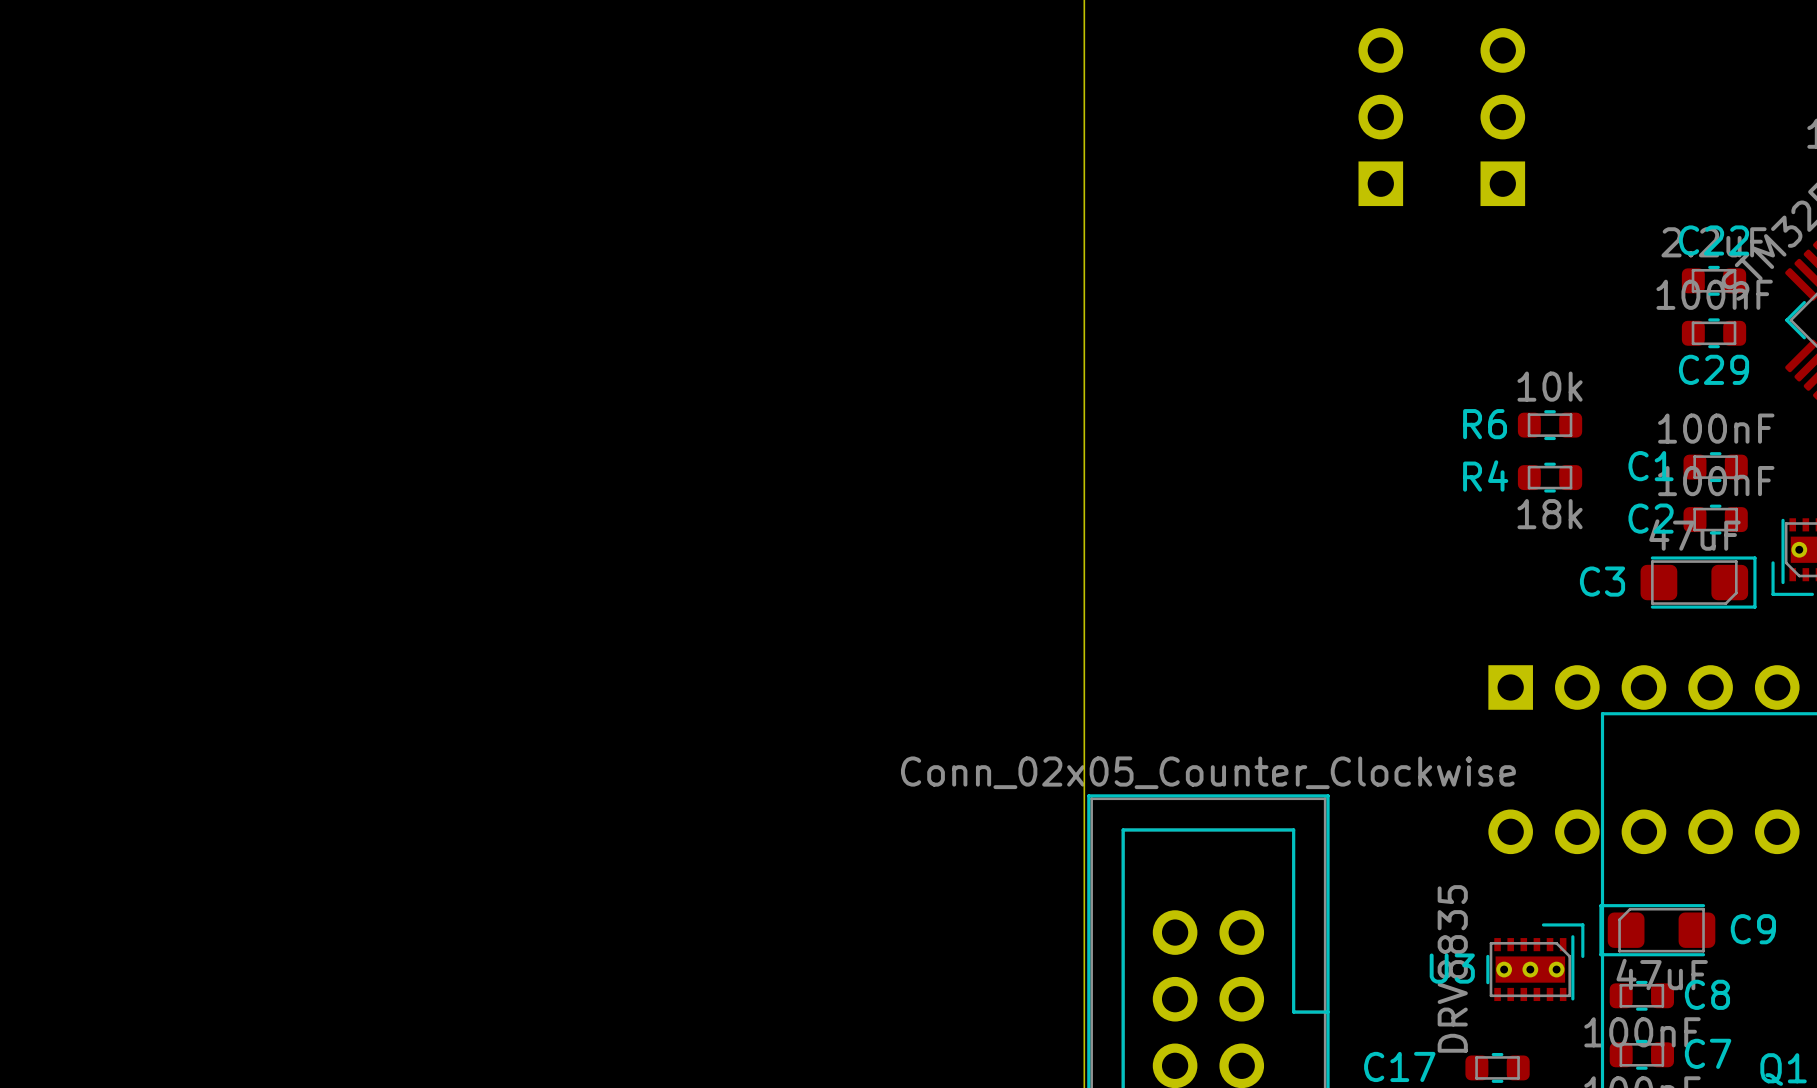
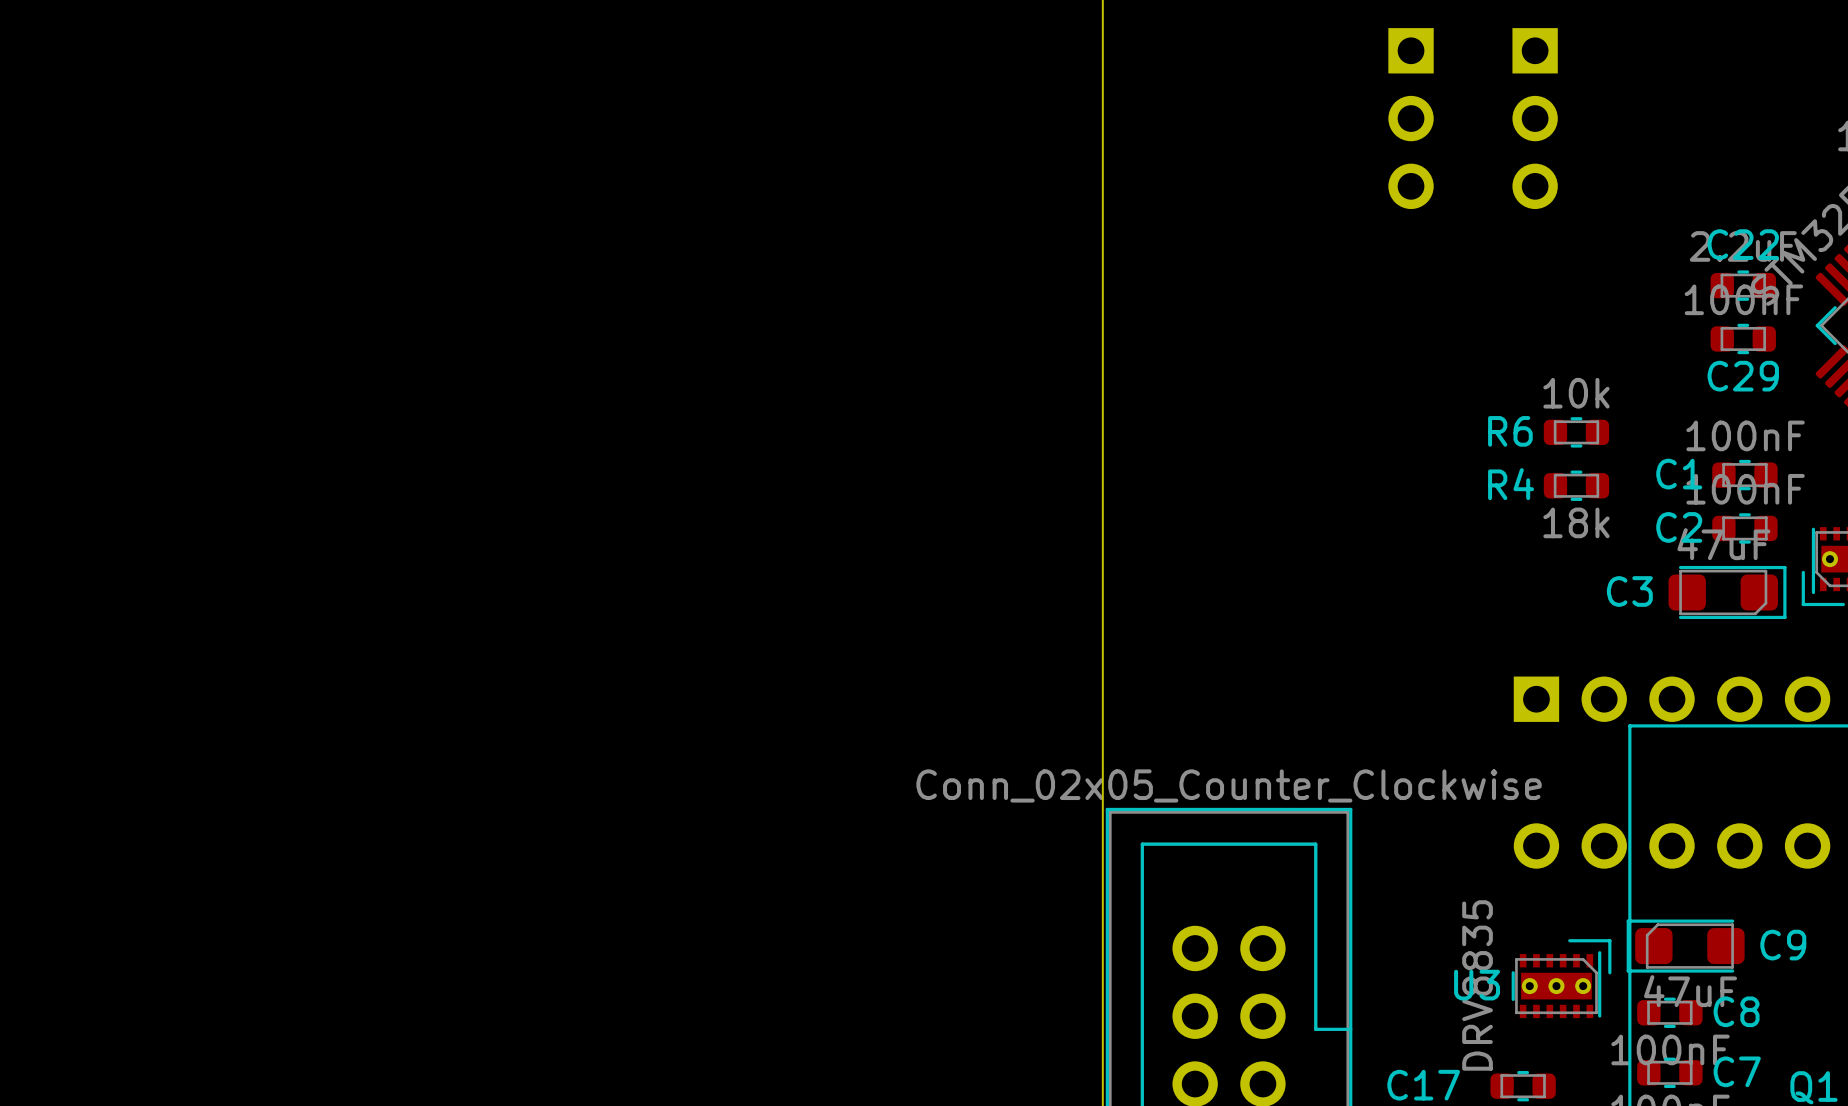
part rotation: 0° (1380, 117) -> 180° (1411, 118)
part rotation: 0° (1502, 117) -> 180° (1535, 118)

